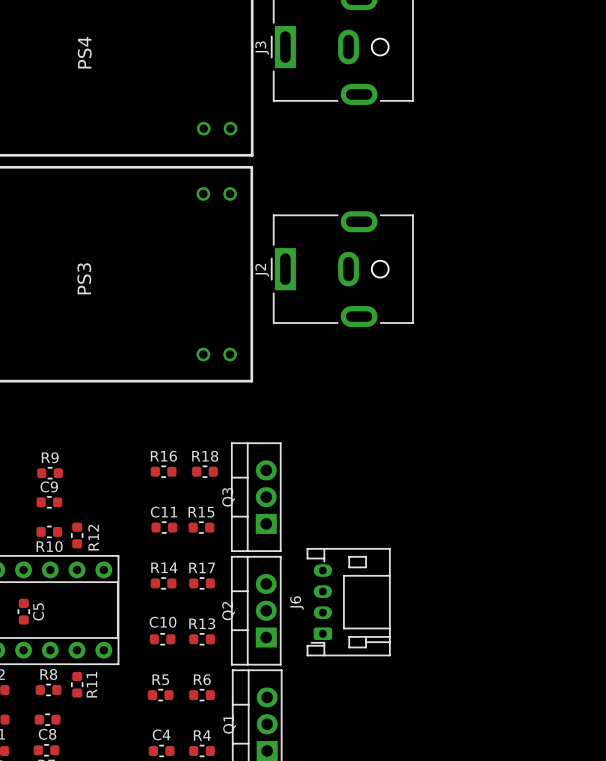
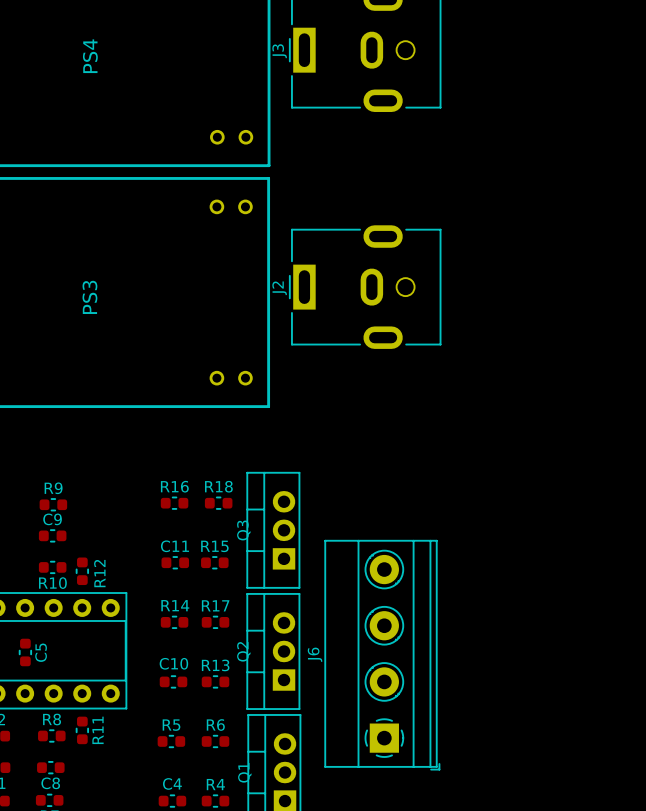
J6 footprint: [306, 548, 391, 657] -> [324, 540, 441, 771]

